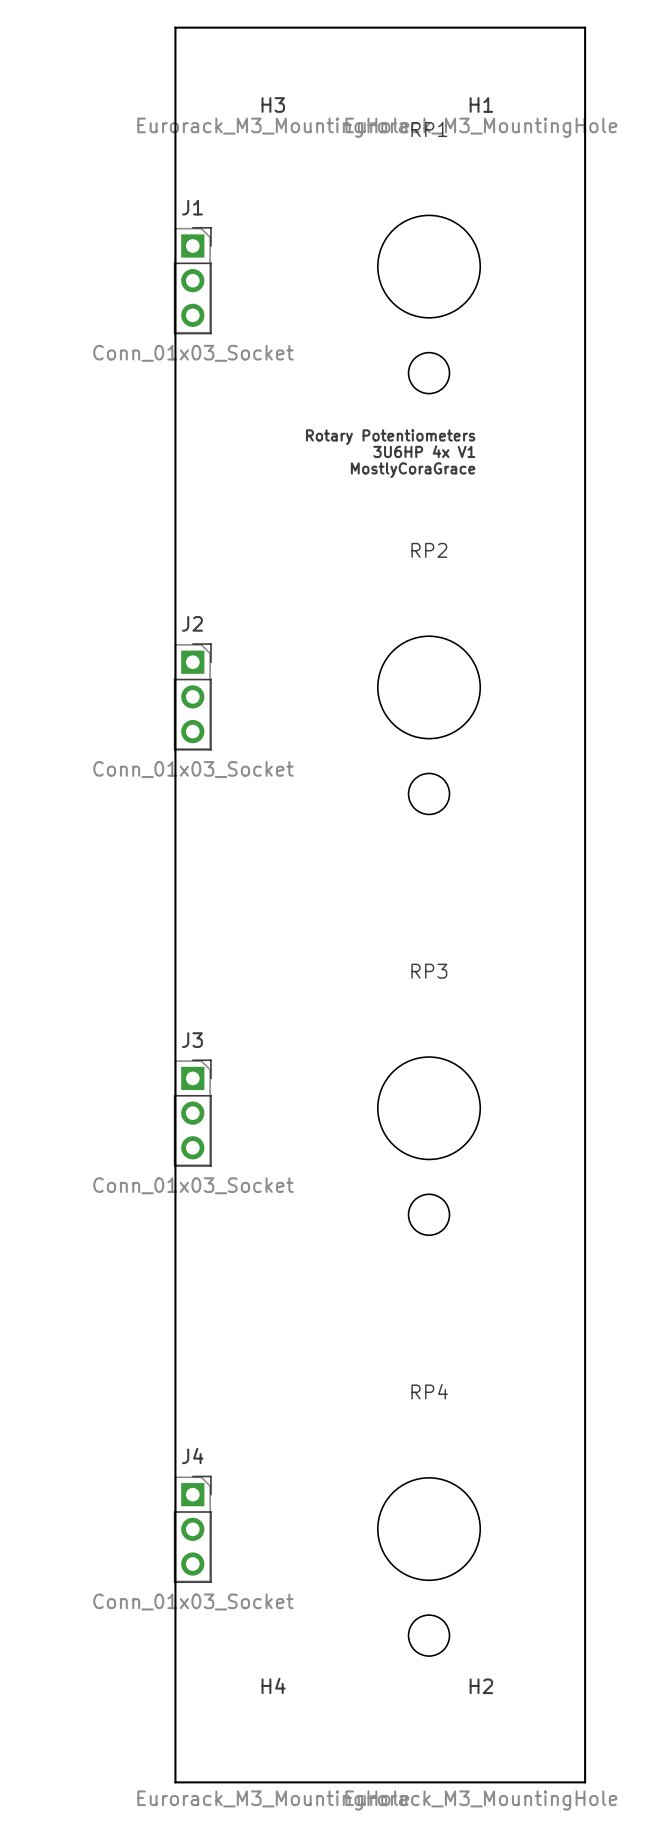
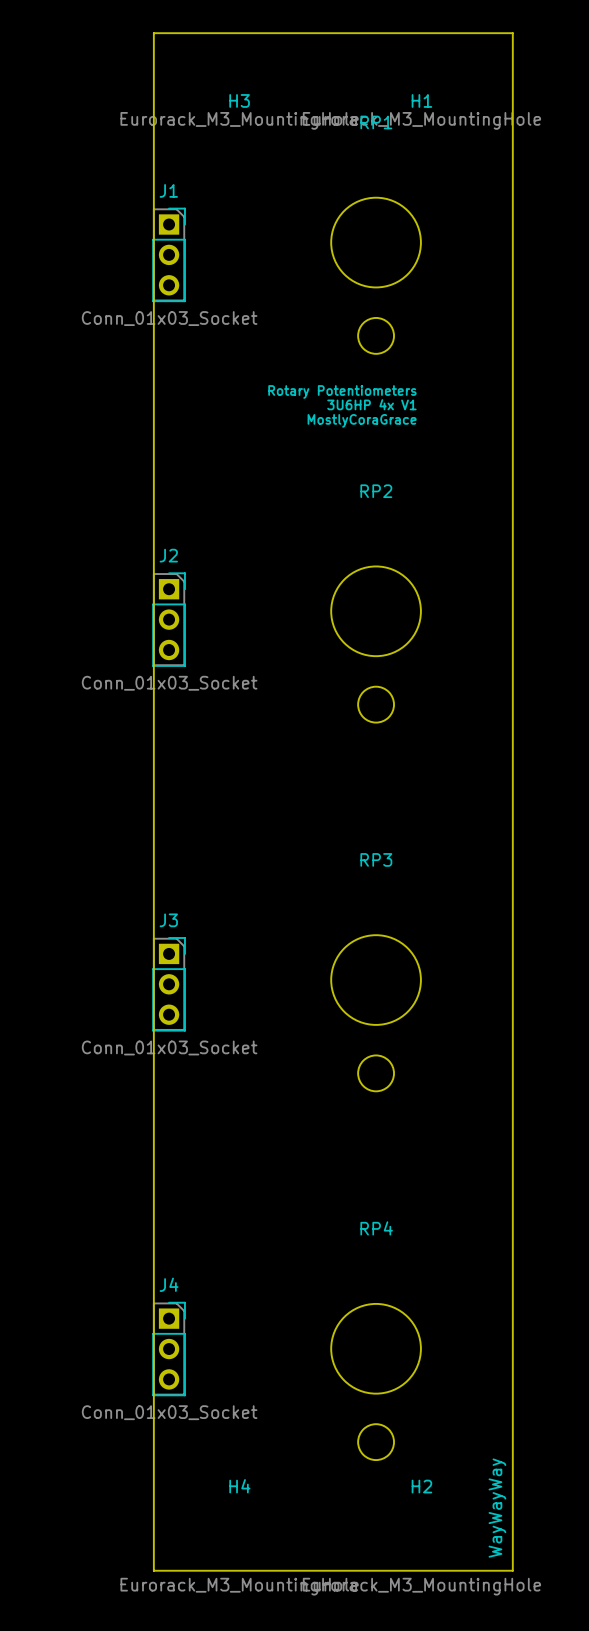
text: none -> WayWayWay (497, 1508)

